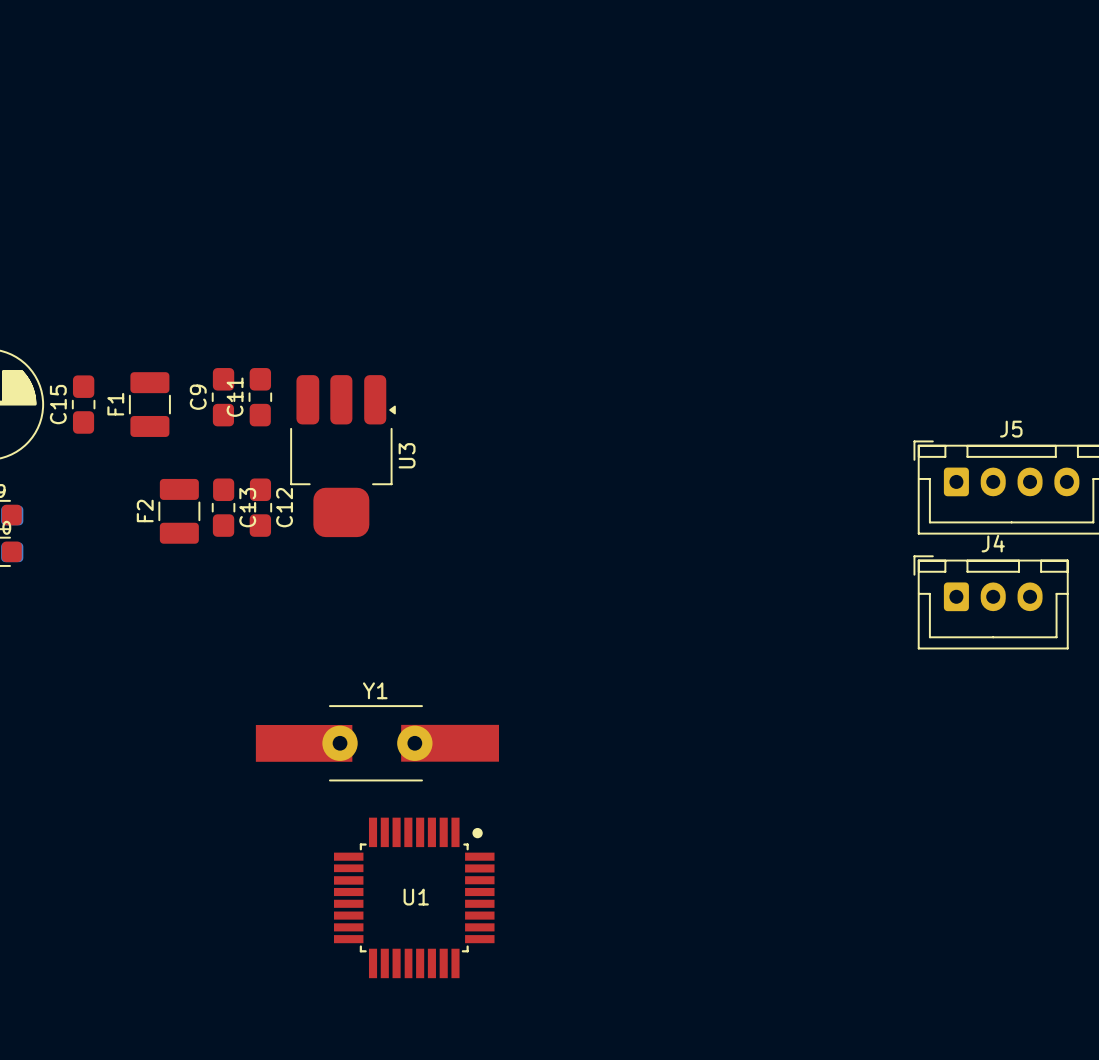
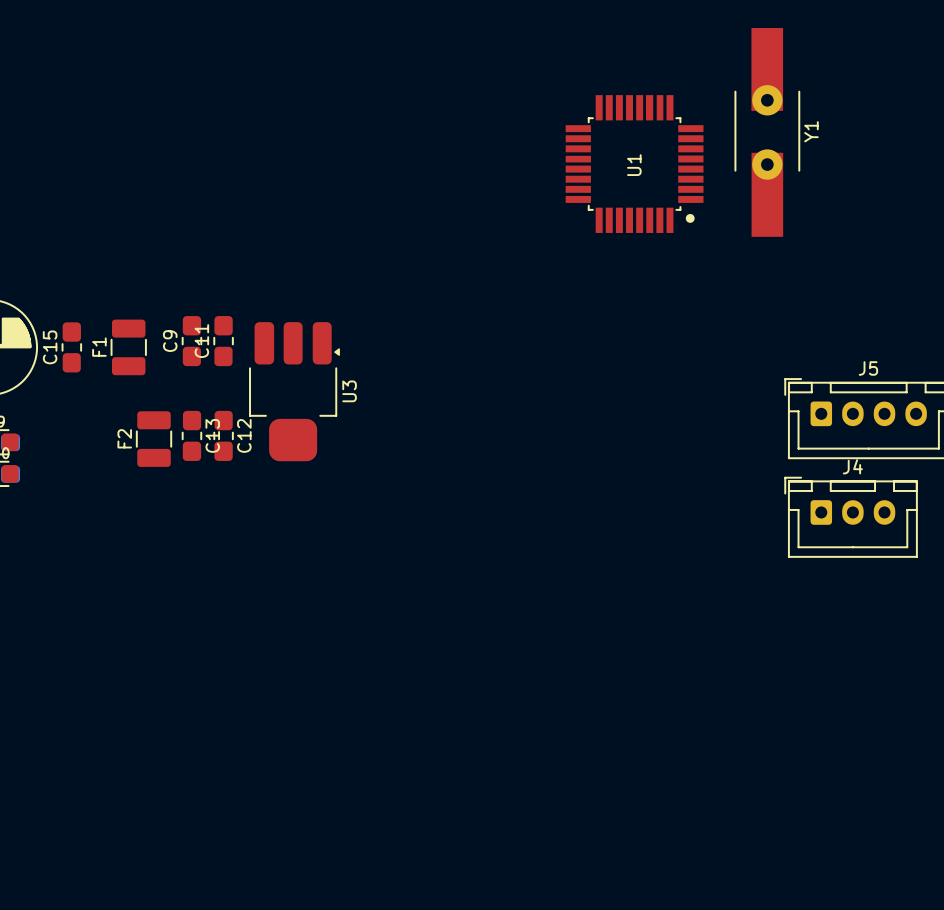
Y1 rotation: 0° (377, 743) -> 90° clockwise (767, 132)
Y1 position: (377, 743) -> (767, 132)
U1 rotation: 0° (414, 897) -> 90° clockwise (634, 164)
U1 position: (414, 897) -> (634, 164)

